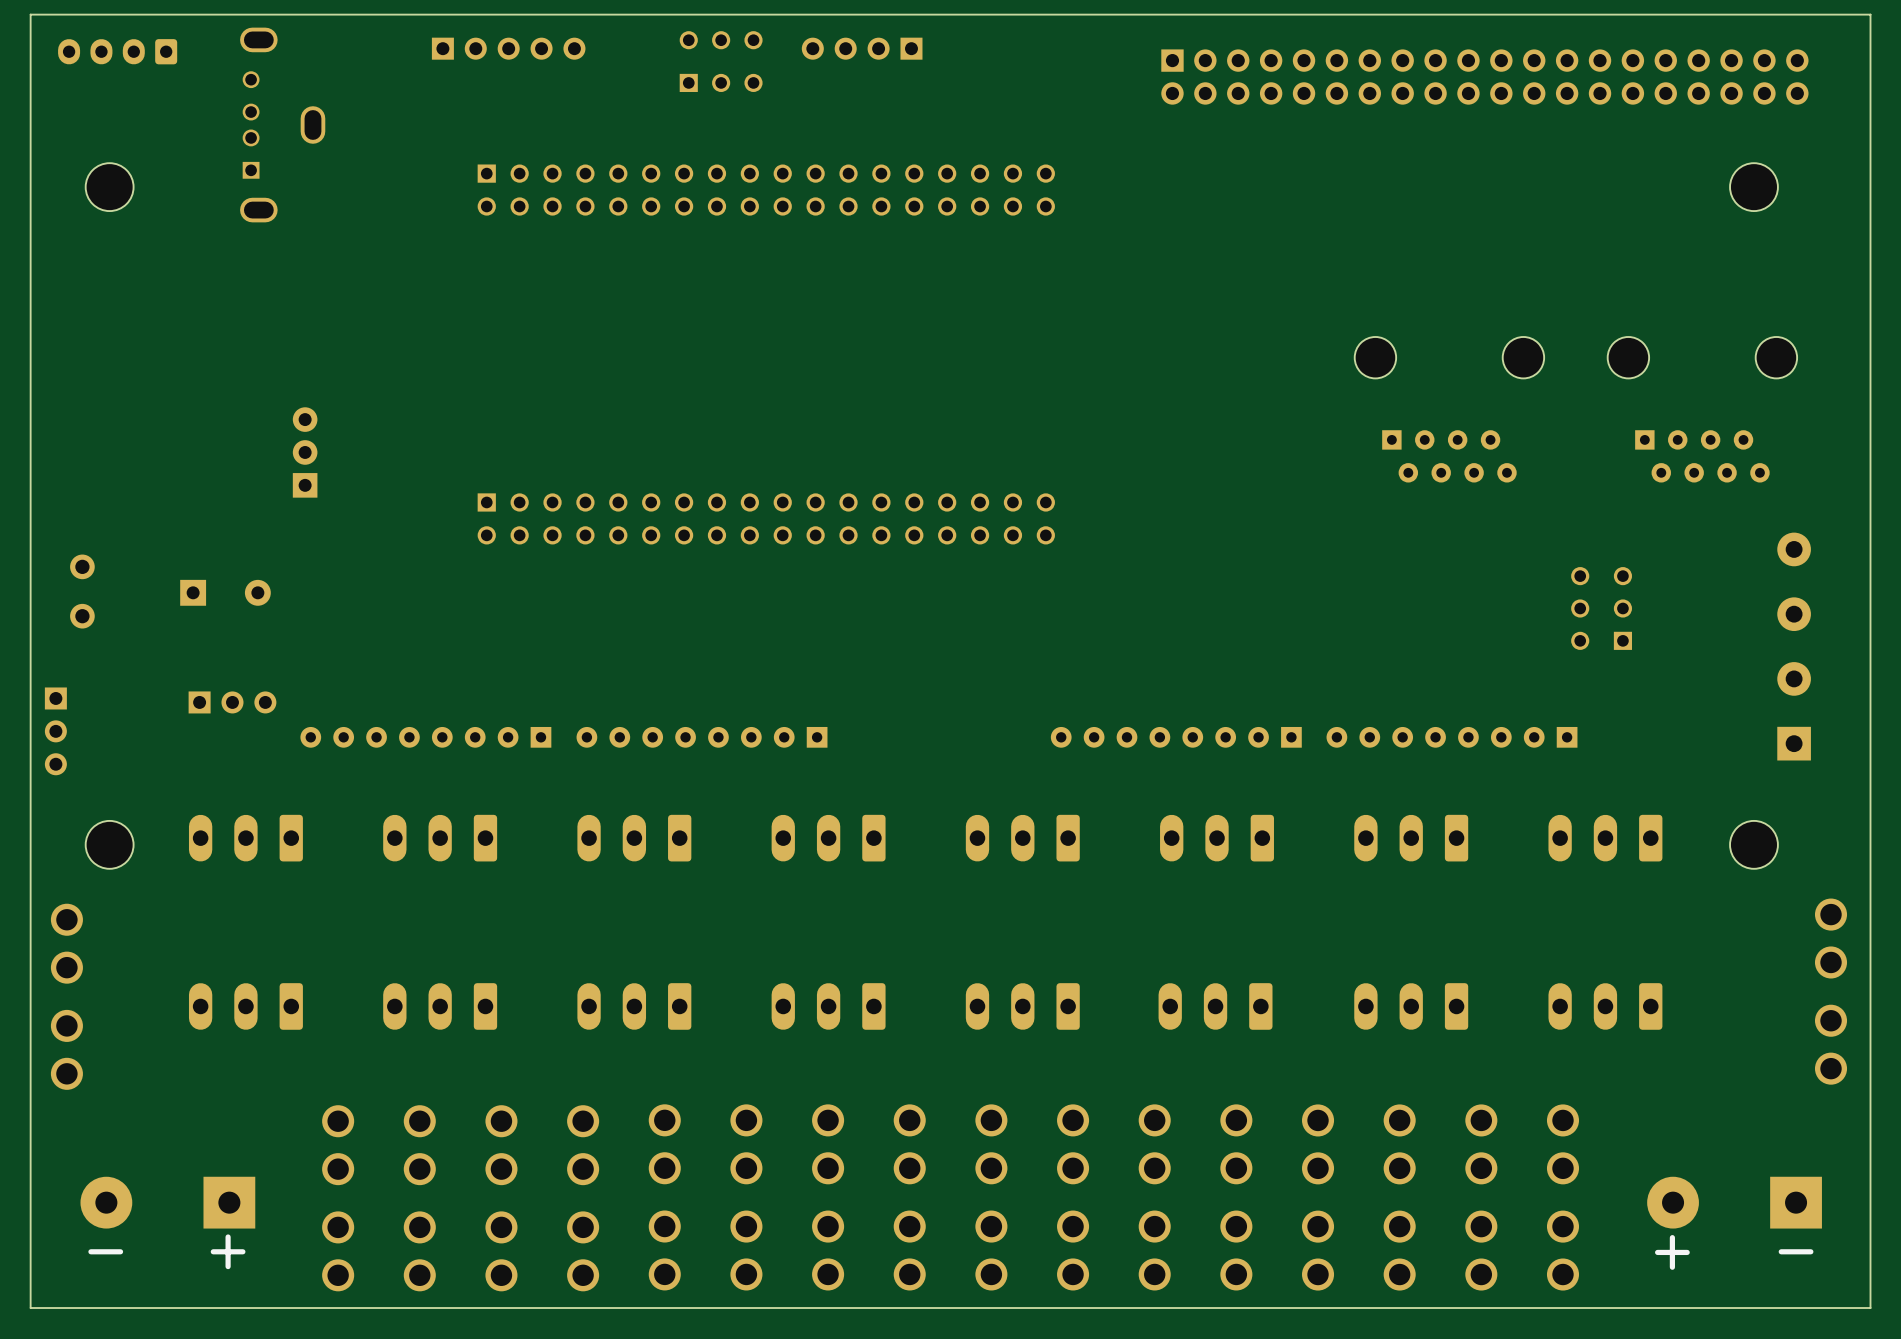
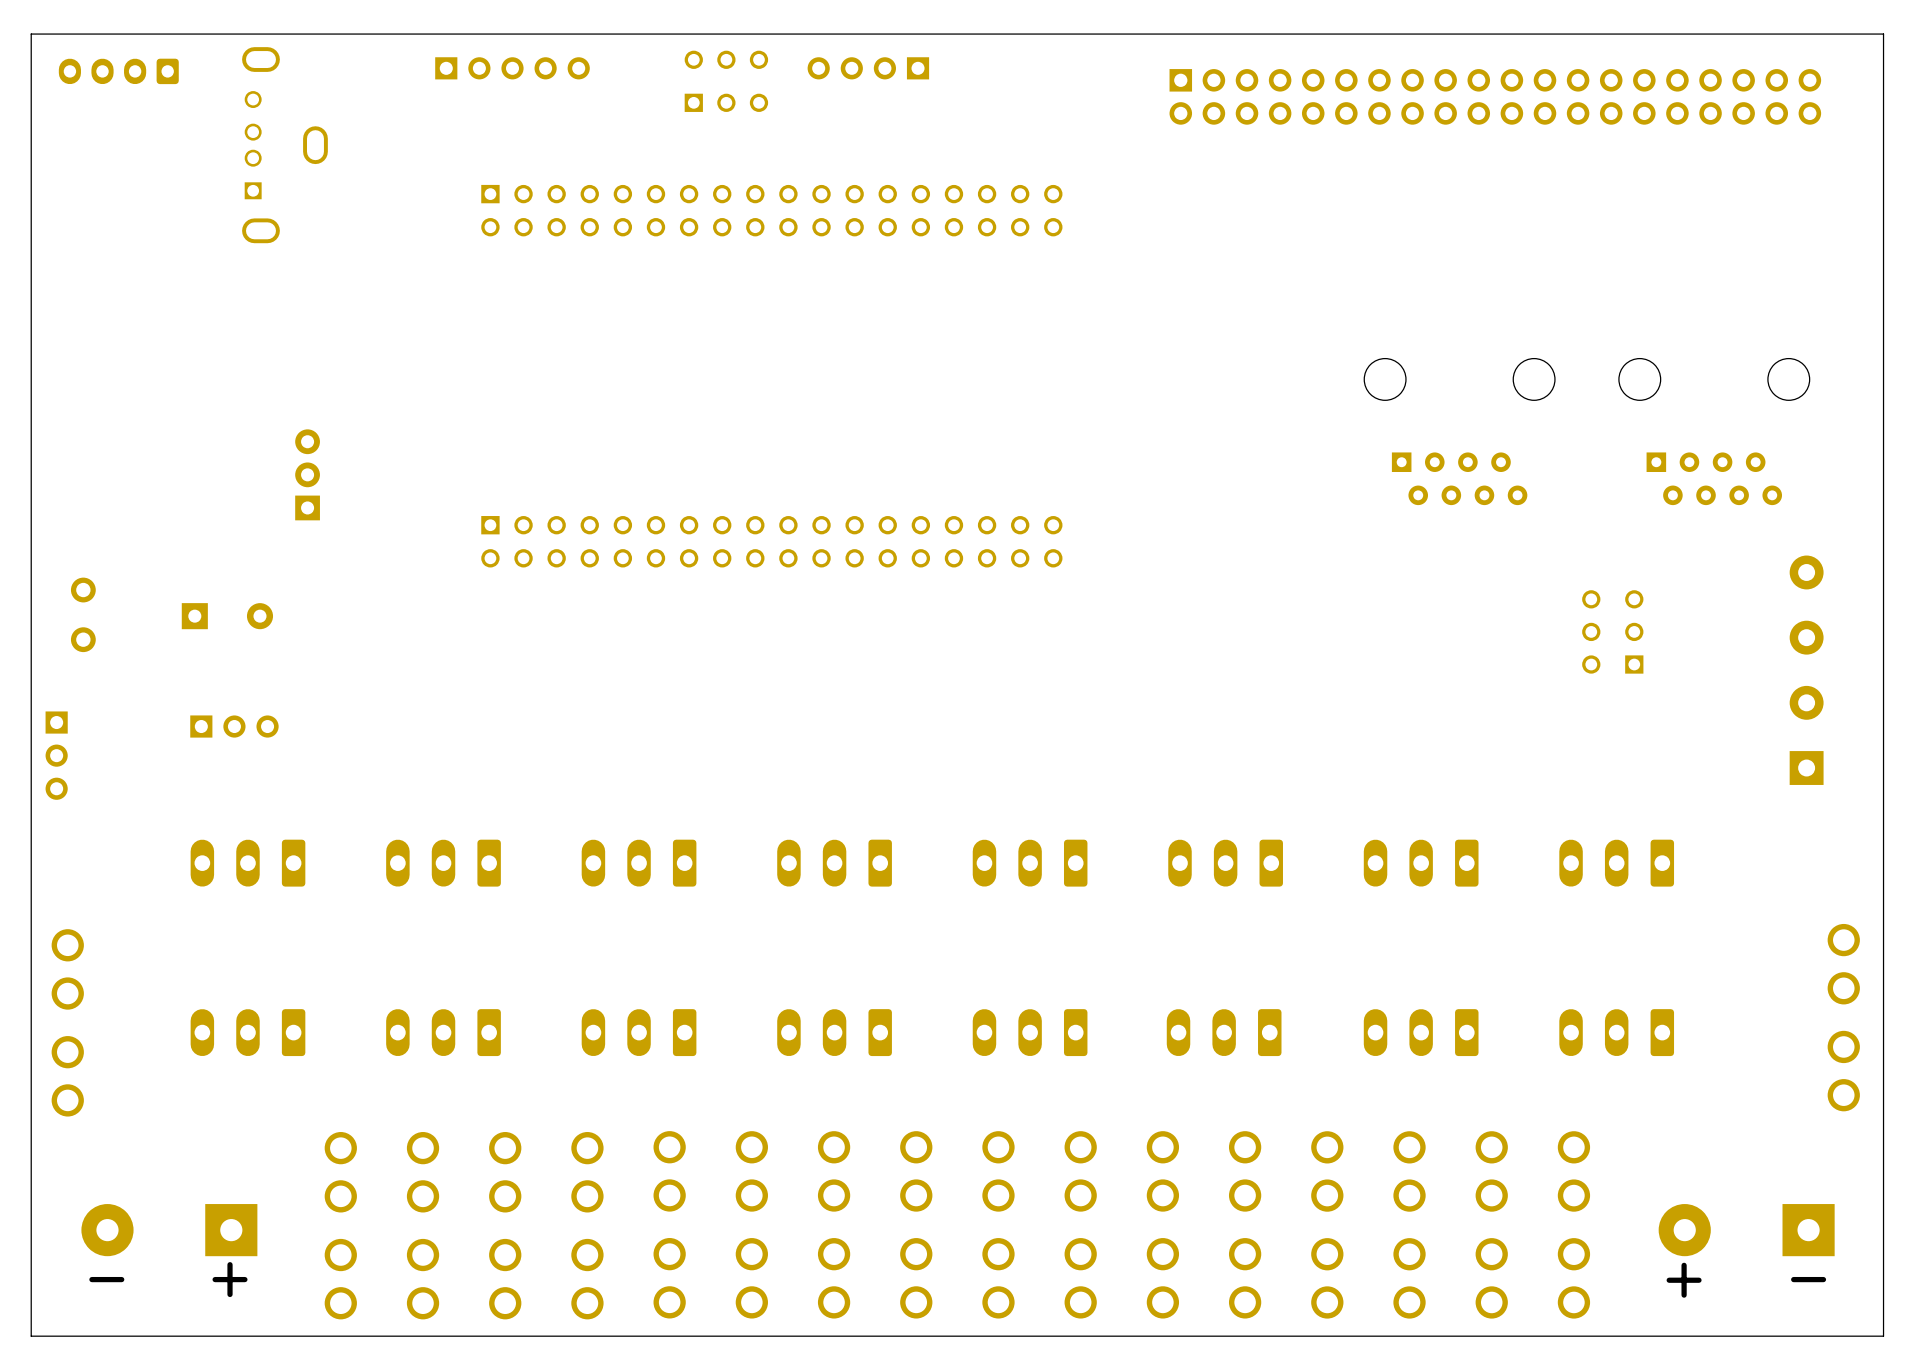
part: (109, 187) -> none
part: (1753, 187) -> none
part: (425, 737) -> none
part: (702, 737) -> none
part: (1176, 737) -> none
part: (1451, 737) -> none
part: (109, 844) -> none
part: (1753, 844) -> none

